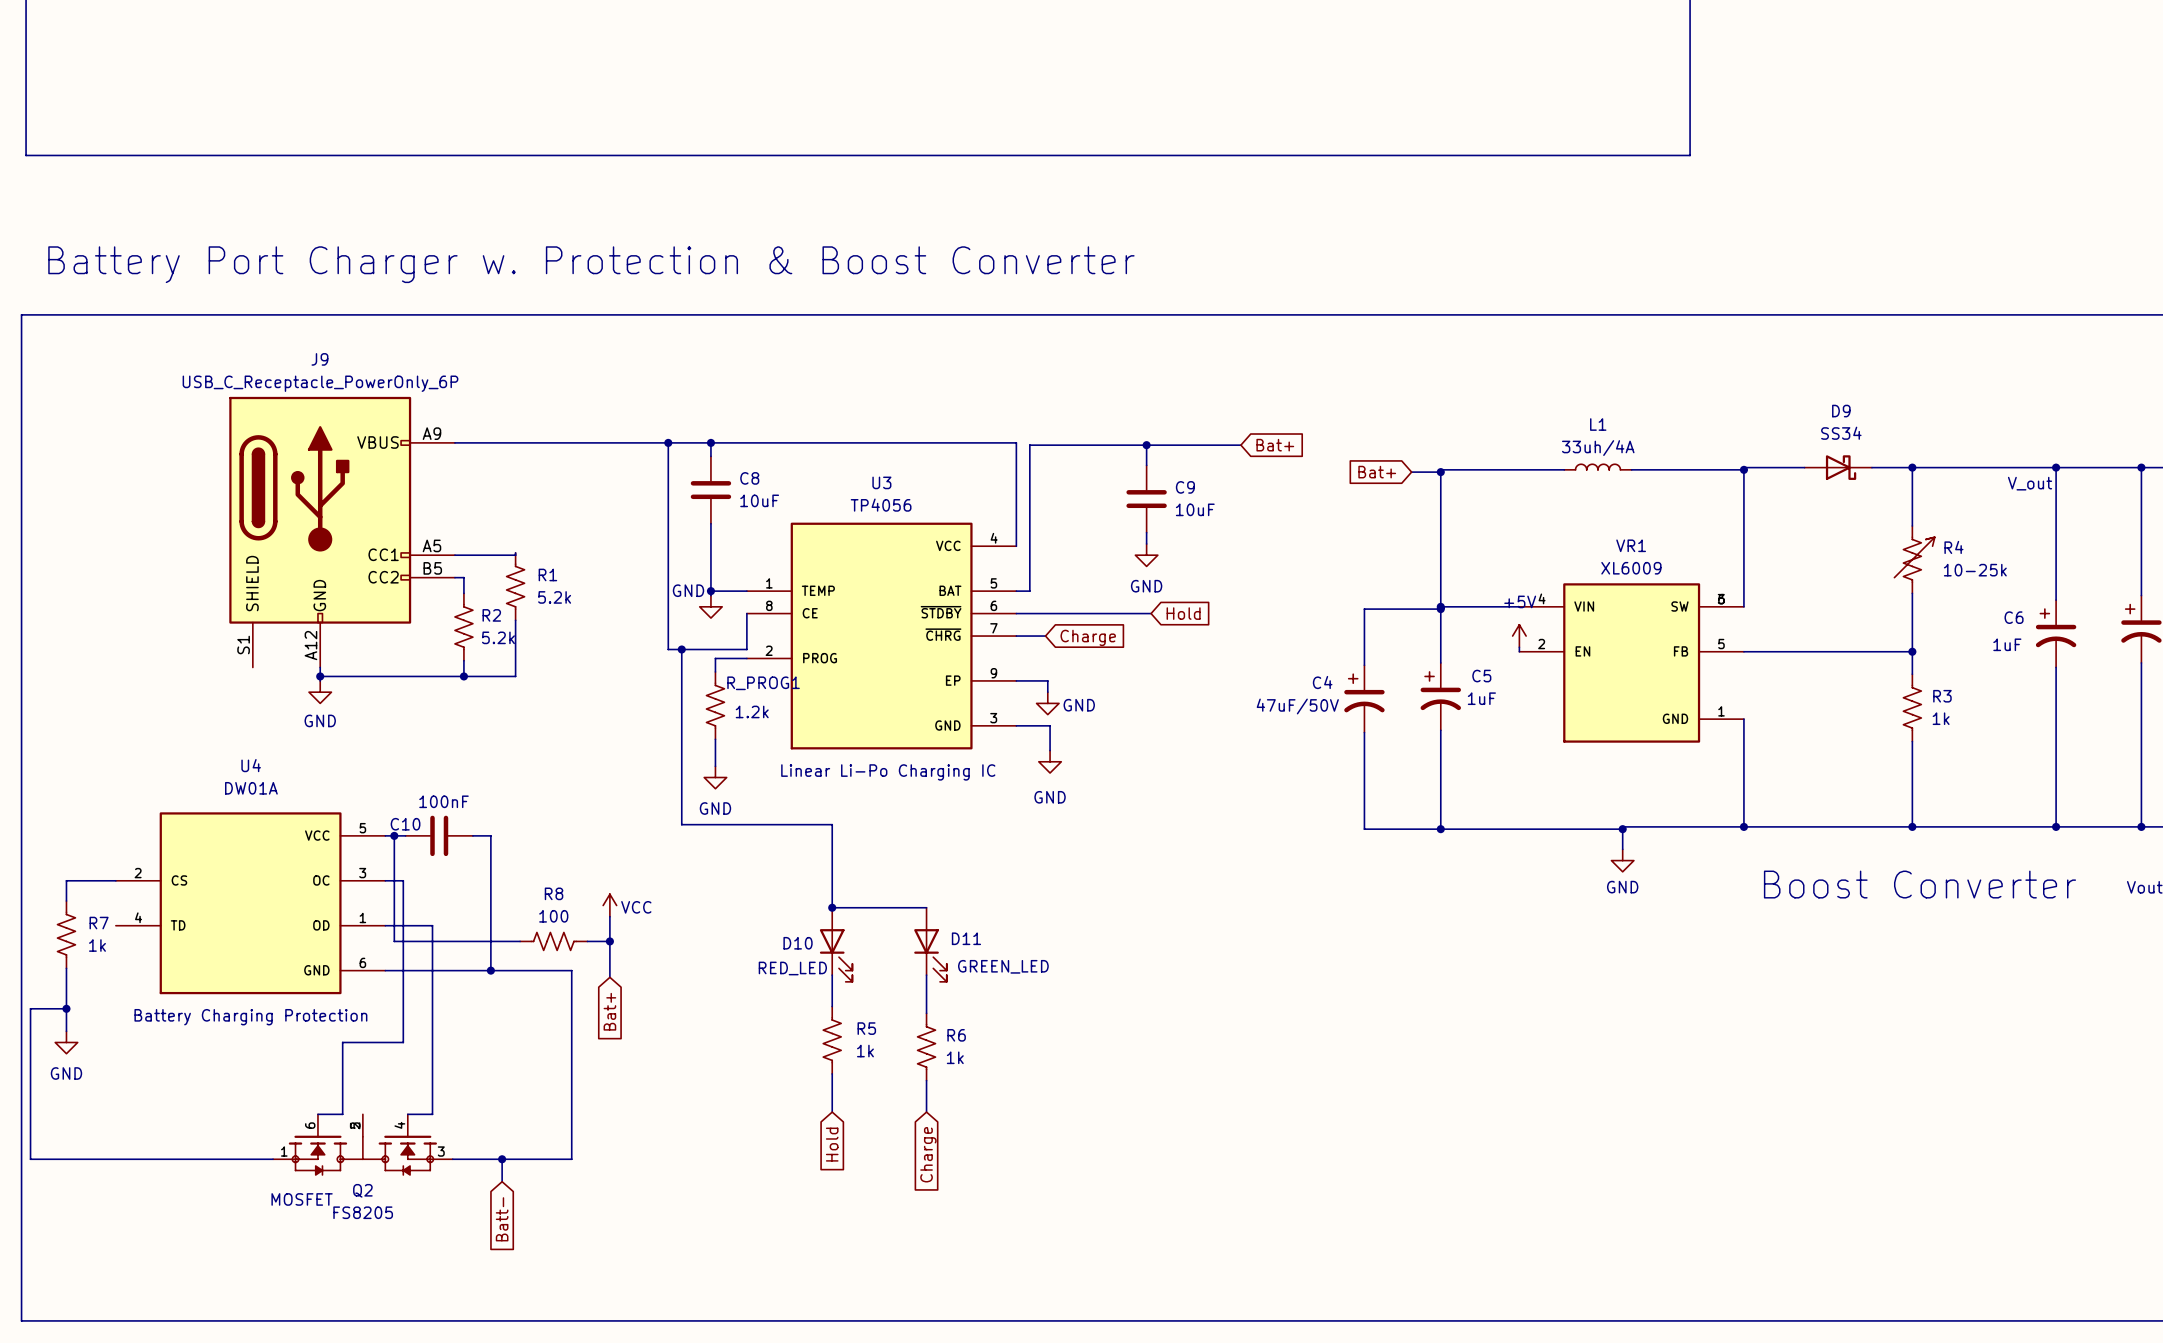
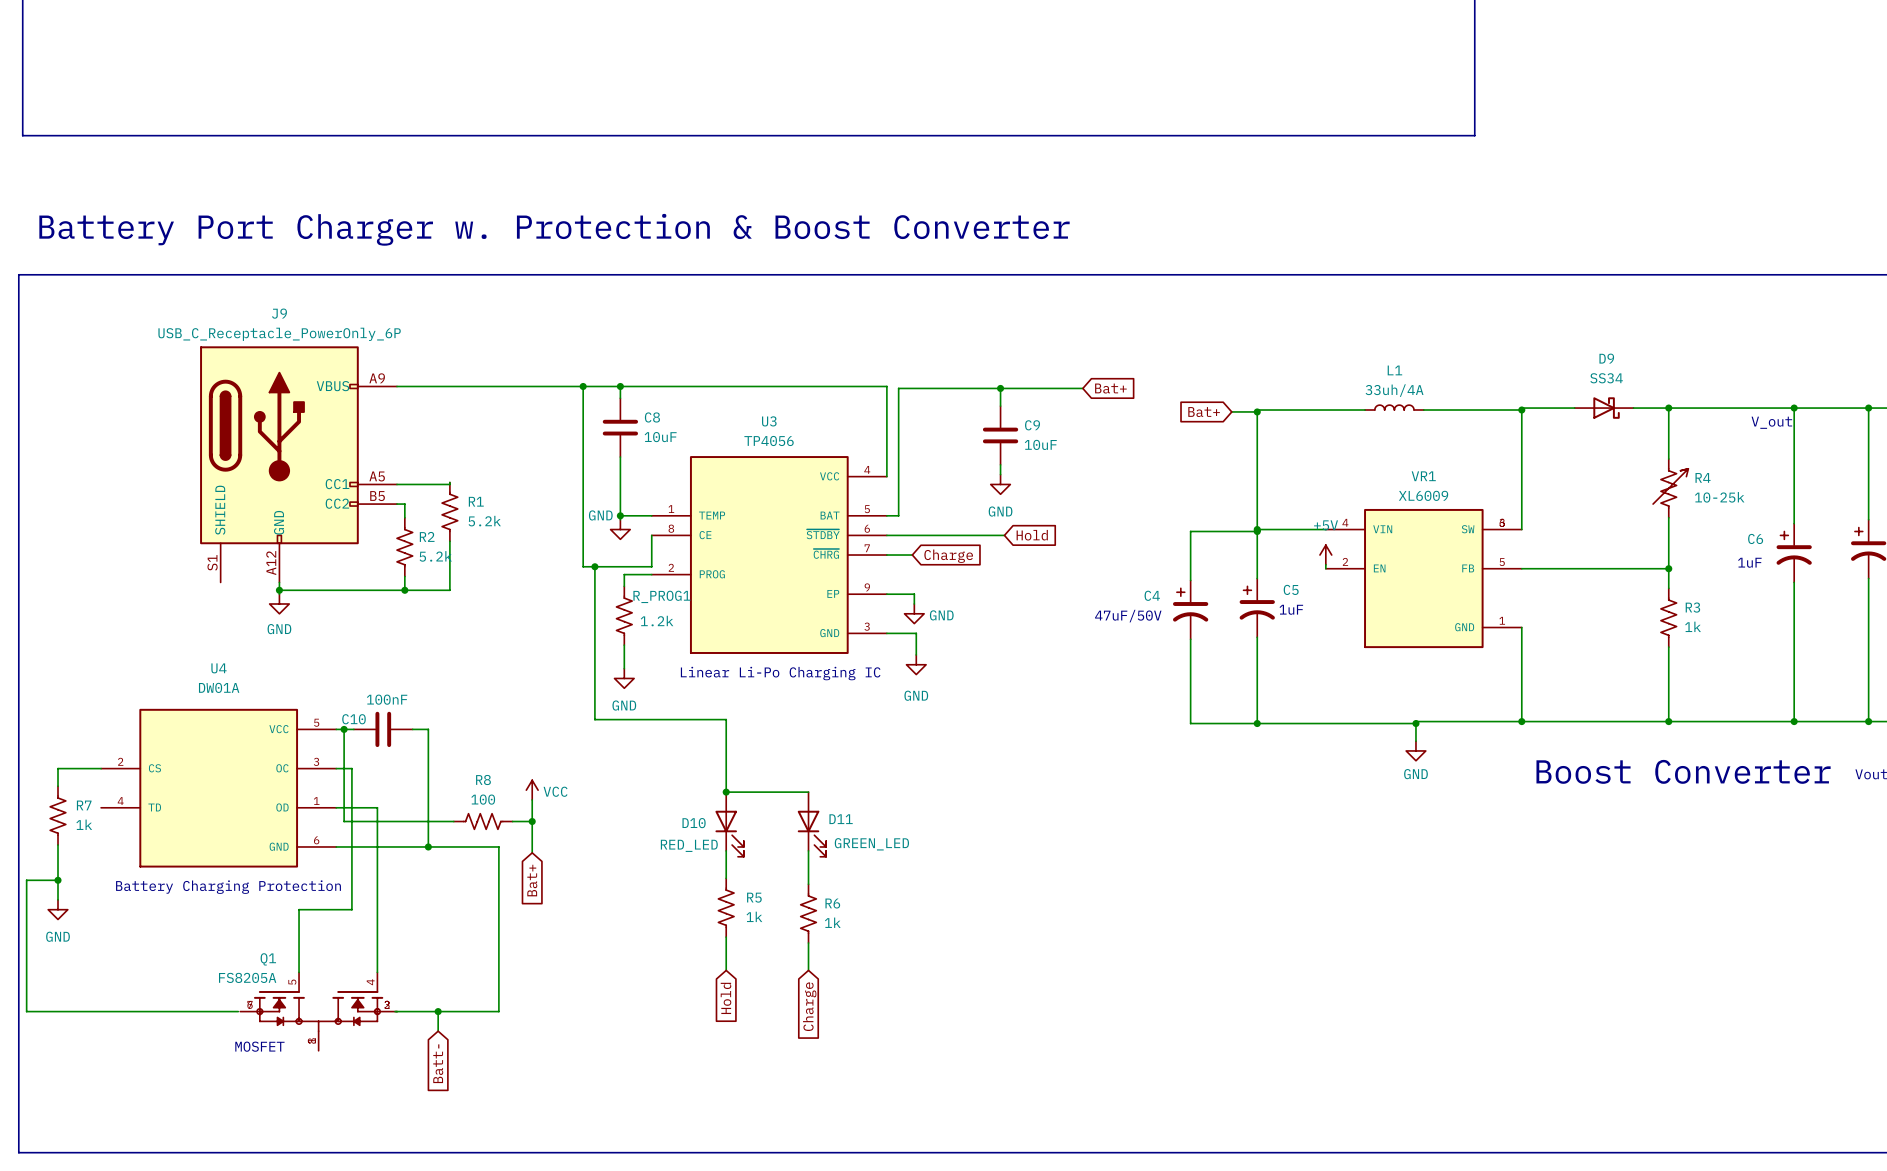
wire: (317, 1114) (342, 1114) -> none
wire: (407, 1114) (432, 1114) -> none
Q2: FS8205 (362, 1145) -> none
Q1: none -> FS8205A (318, 1011)

